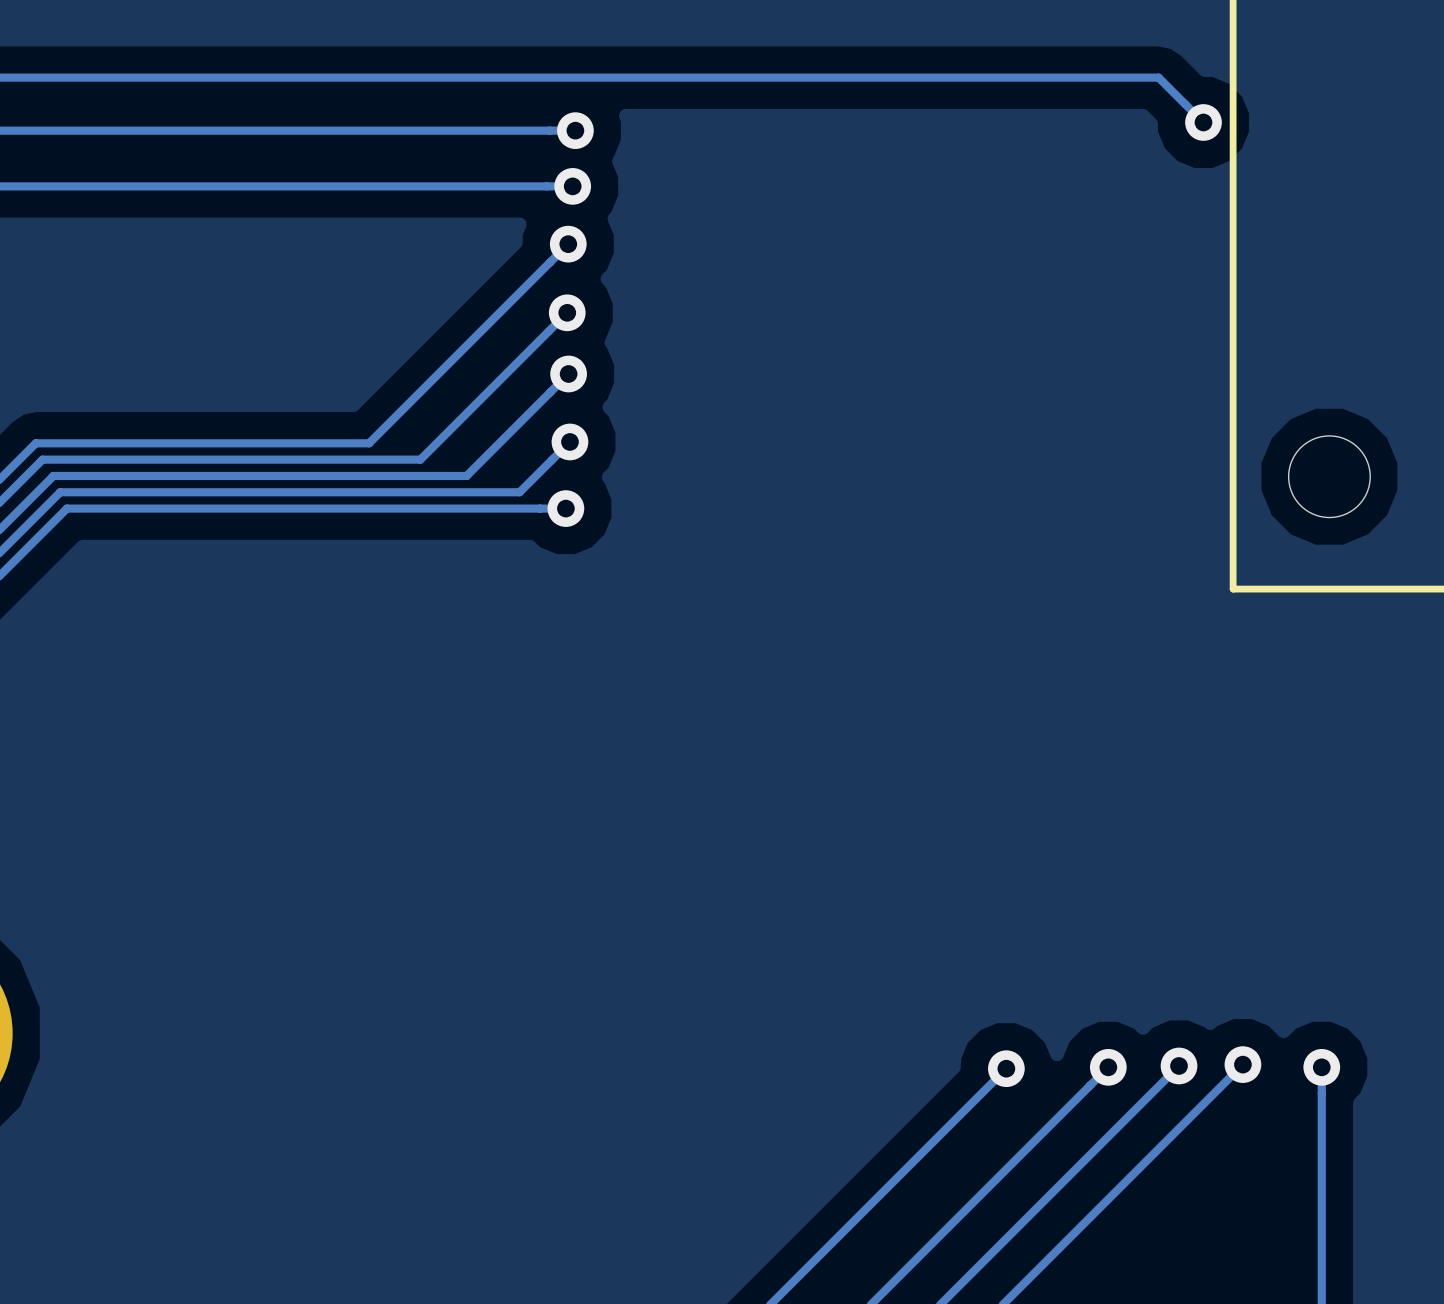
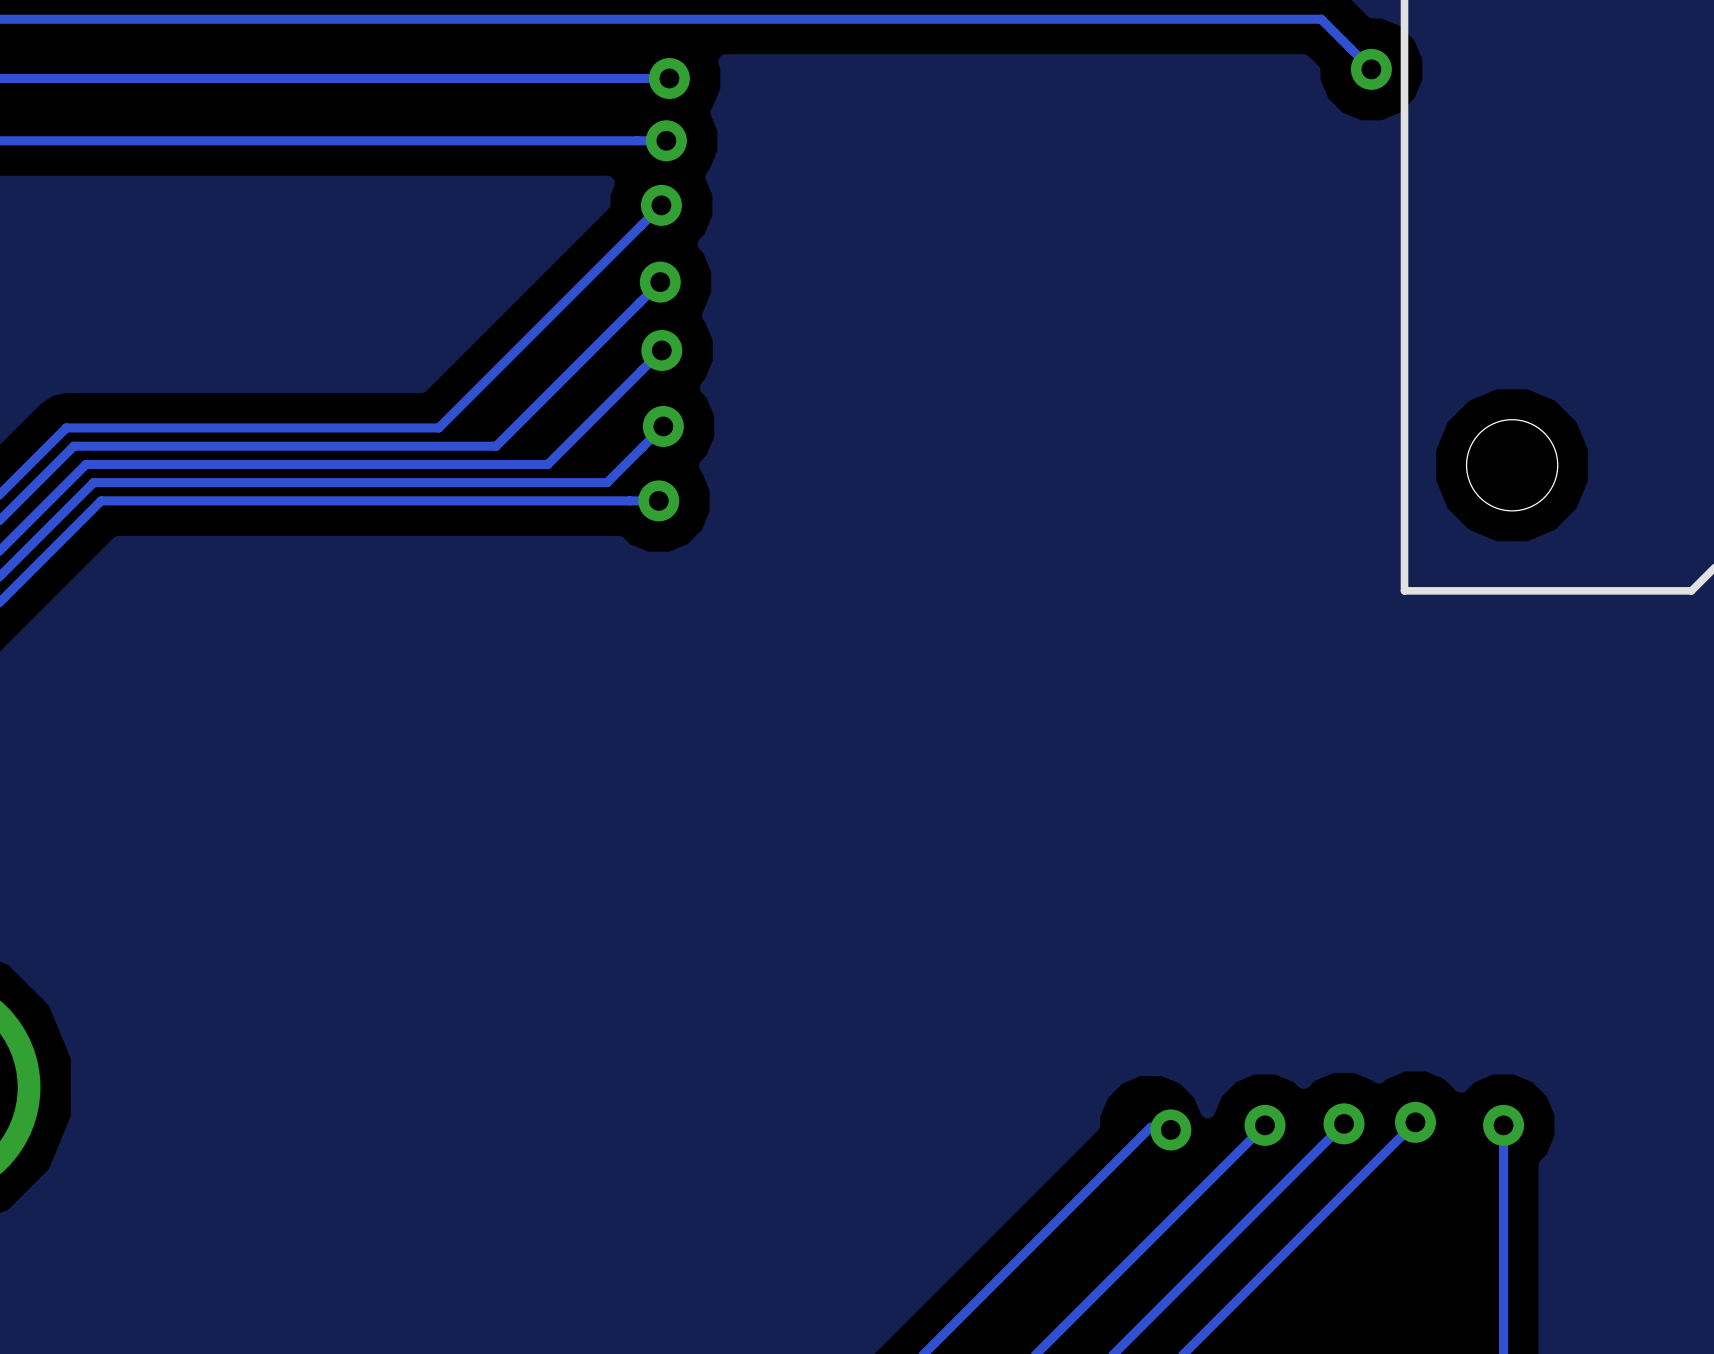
via position: (1006, 1068) -> (1170, 1129)

